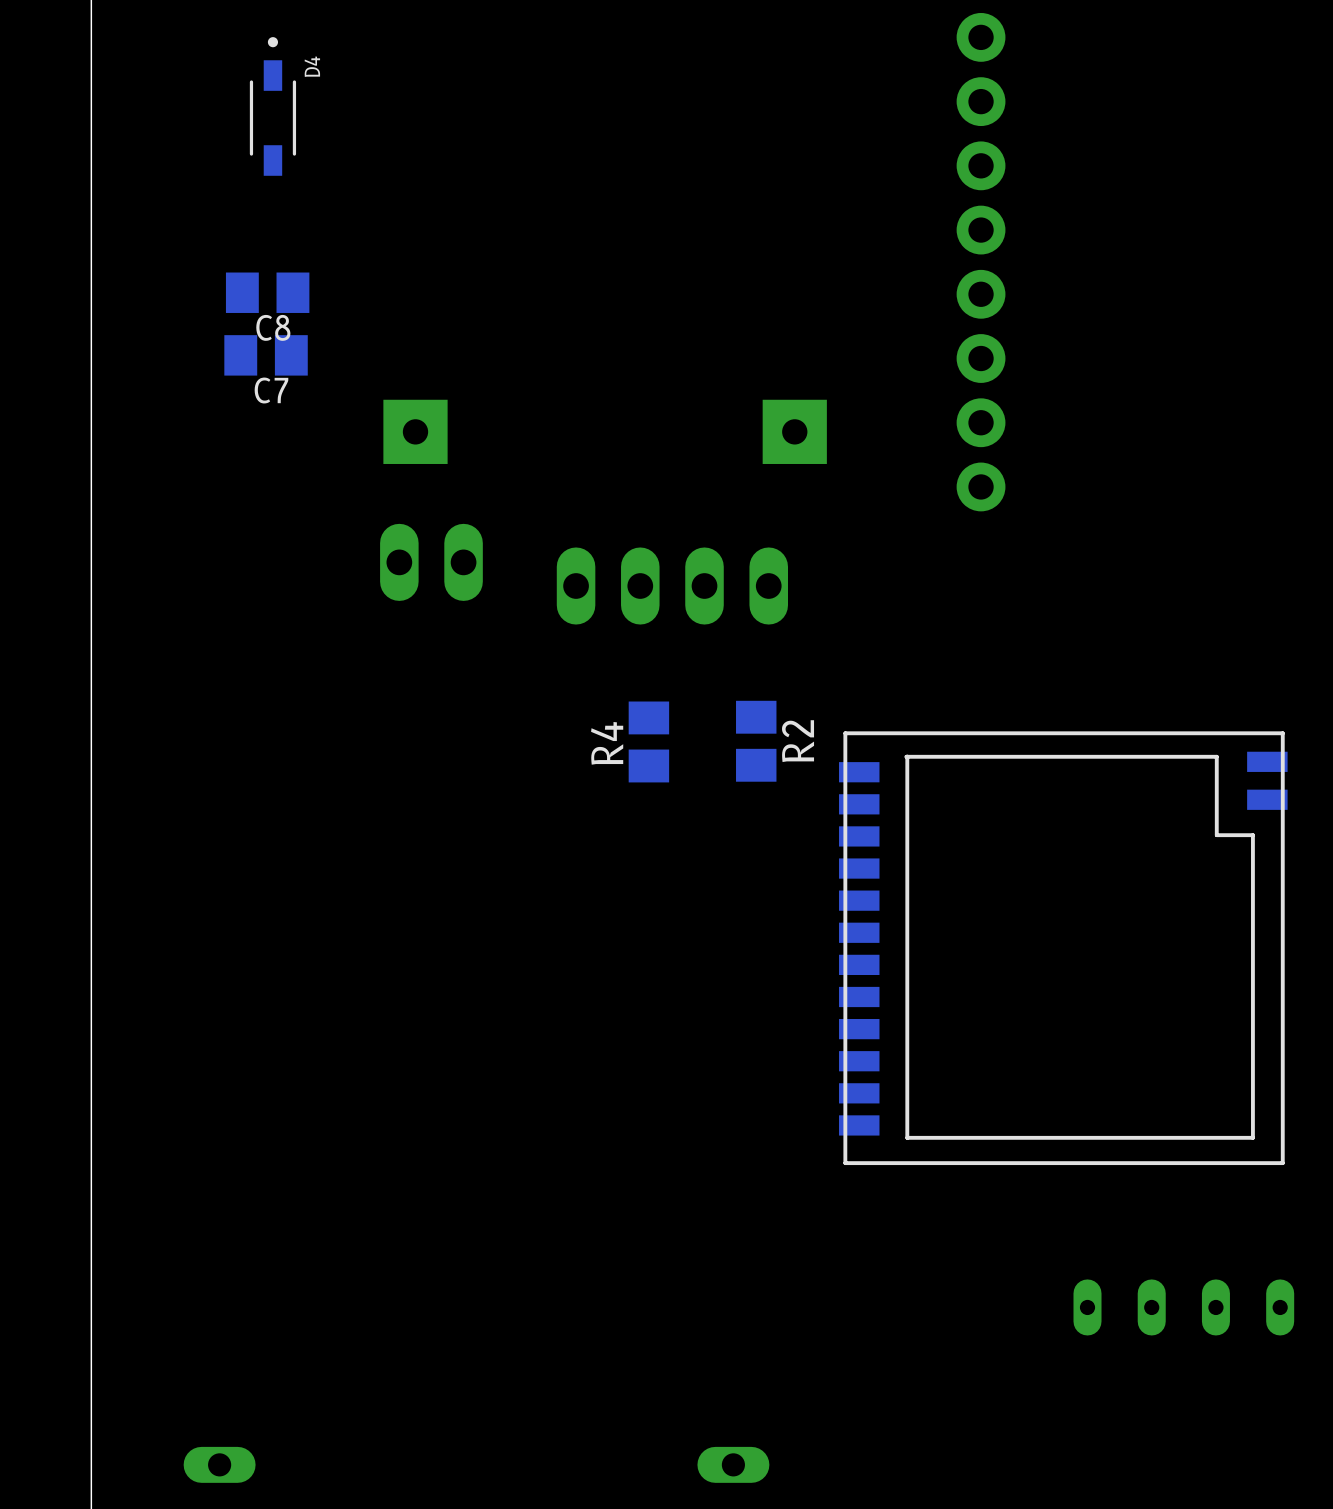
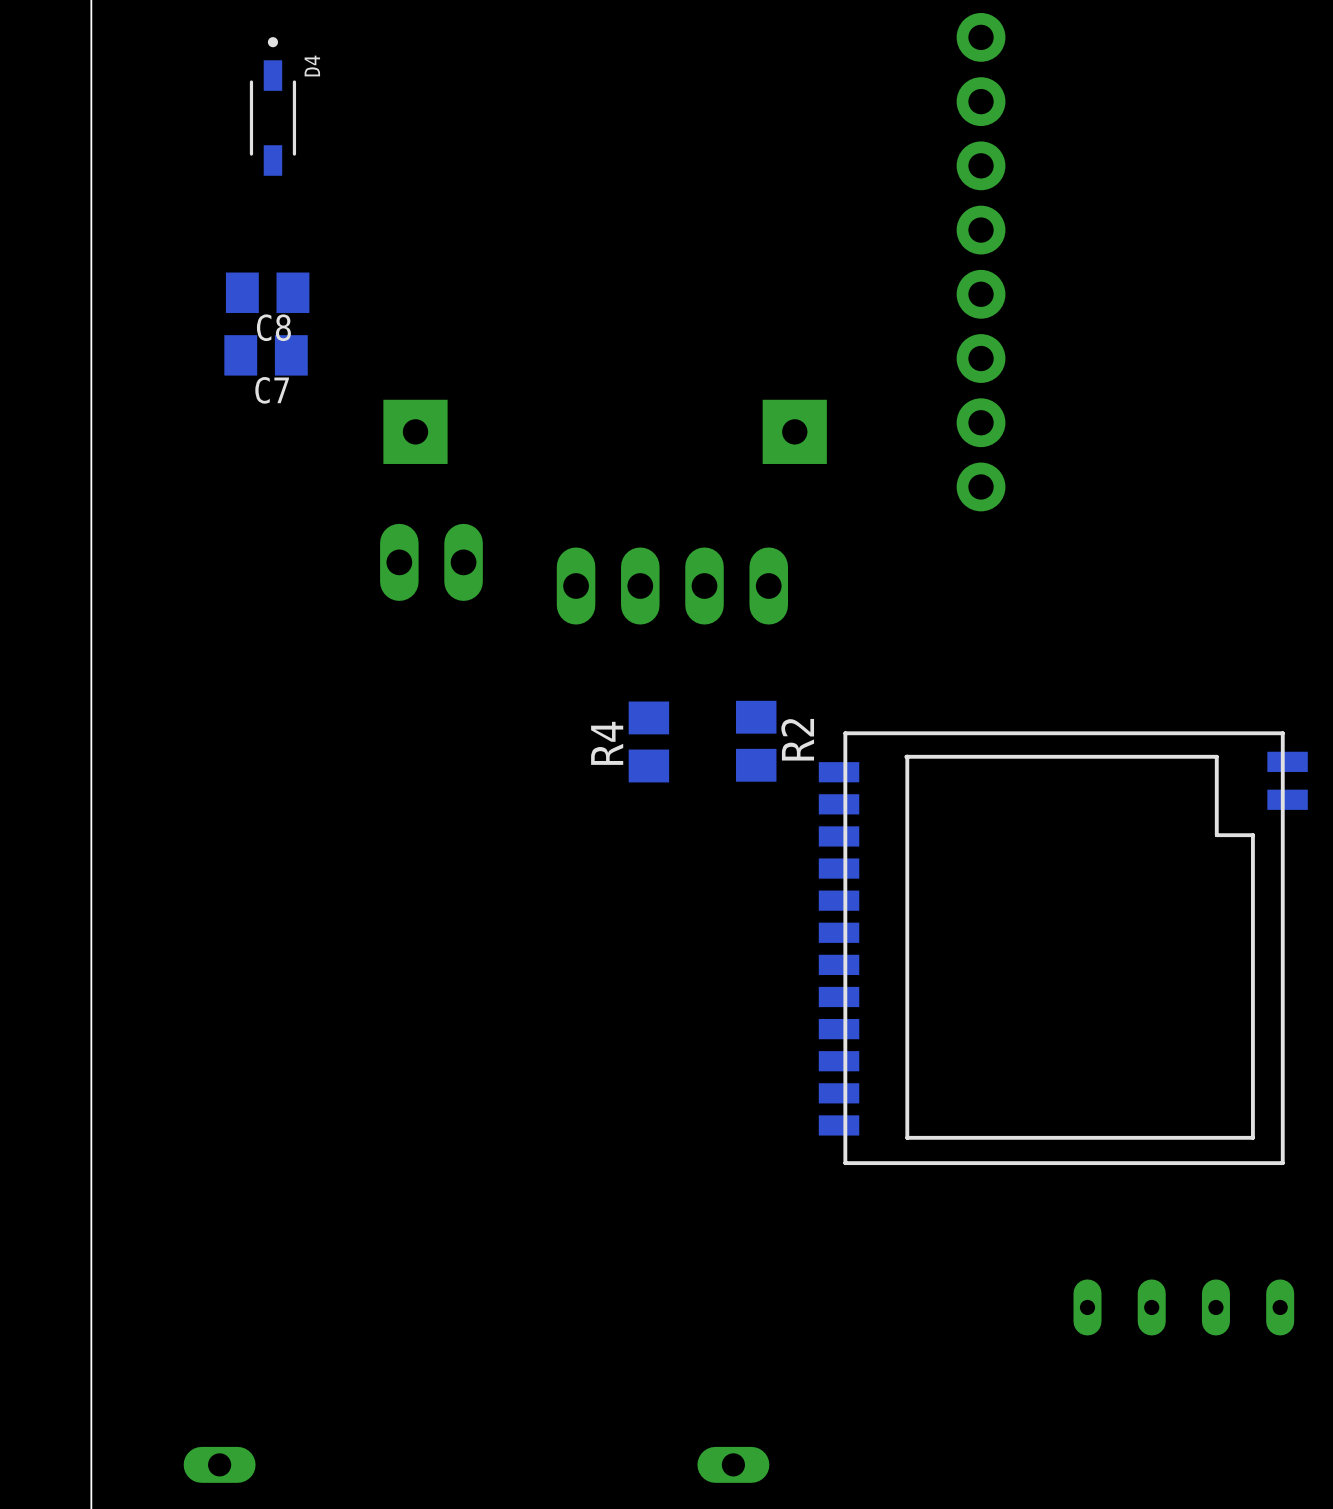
part footprint: [839, 731, 1288, 1166] -> [818, 731, 1308, 1166]

